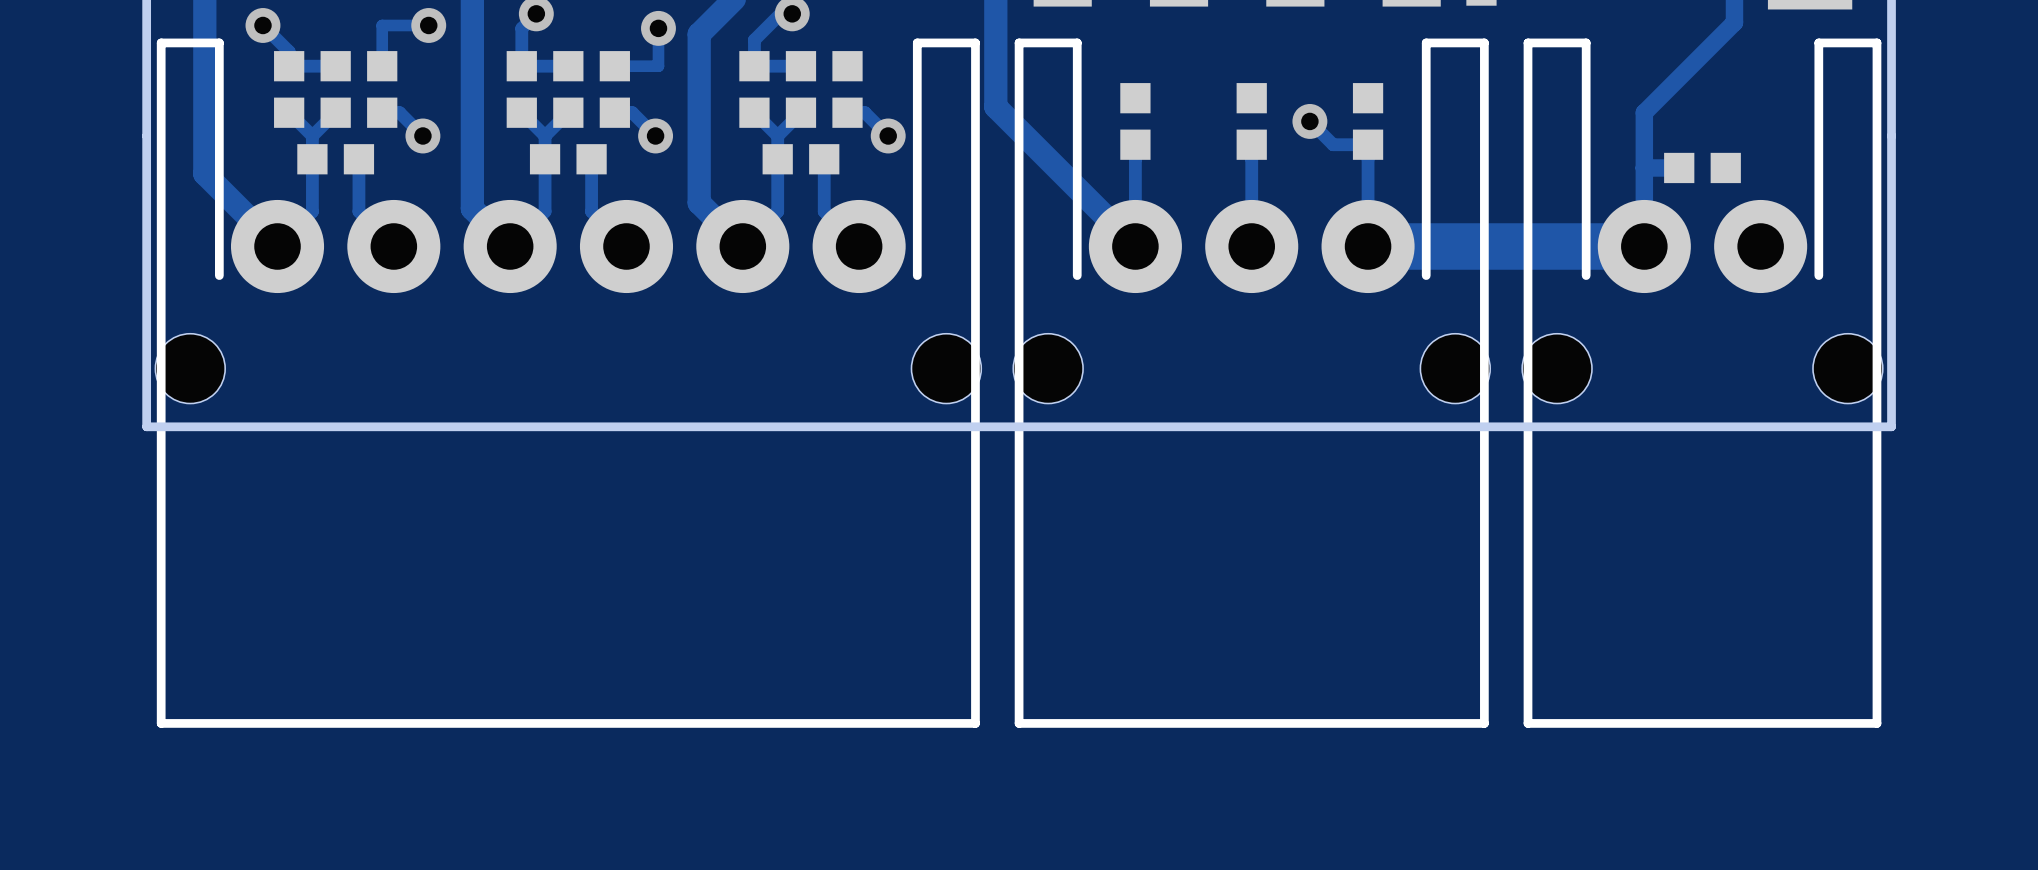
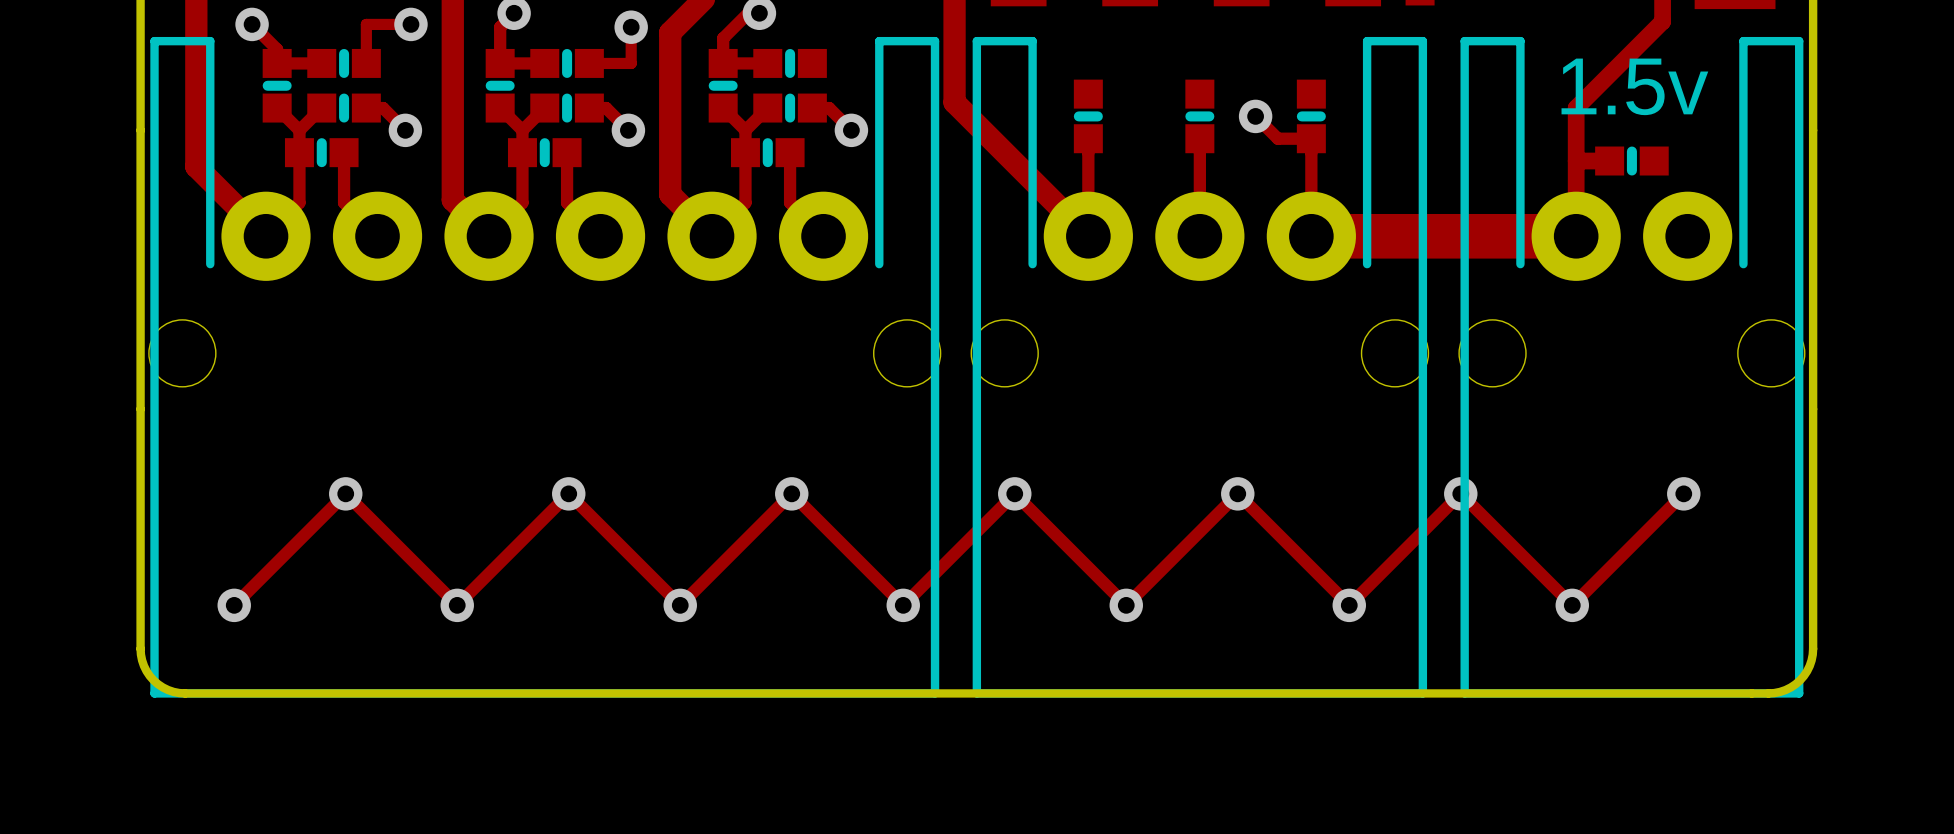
line: none -> (344, 53) (344, 72)
line: none -> (567, 53) (567, 72)
line: none -> (790, 53) (790, 72)
line: none -> (267, 85) (286, 85)
line: none -> (490, 85) (509, 85)
line: none -> (713, 85) (732, 85)
text: none -> 1.5v (1634, 86)
line: none -> (344, 98) (344, 117)
line: none -> (567, 98) (567, 117)
line: none -> (790, 98) (790, 117)
line: none -> (1078, 116) (1097, 116)
line: none -> (1190, 116) (1209, 116)
line: none -> (1301, 116) (1320, 116)
line: none -> (321, 143) (321, 162)
line: none -> (544, 143) (544, 162)
line: none -> (767, 143) (767, 162)
line: none -> (1631, 151) (1631, 170)
board edge: (146, 426) (1891, 426) -> (140, 409) (140, 654) (143, 665) (153, 680) (168, 690) (185, 693) (1774, 693) (1790, 687) (1800, 680) (1809, 665) (1812, 654) (1813, 409)
via: none -> (345, 493)
via: none -> (568, 493)
via: none -> (791, 493)
via: none -> (1014, 493)
via: none -> (1237, 493)
via: none -> (1460, 493)
track: none -> (1683, 493) (1572, 605) (1460, 493) (1349, 605) (1237, 493) (1126, 605) (1014, 493) (903, 605) (791, 493) (680, 605) (568, 493) (457, 605) (345, 493) (234, 605)
via: none -> (1683, 493)
via: none -> (234, 605)
via: none -> (457, 605)
via: none -> (680, 605)
via: none -> (903, 605)
via: none -> (1126, 605)
via: none -> (1349, 605)
via: none -> (1572, 605)

